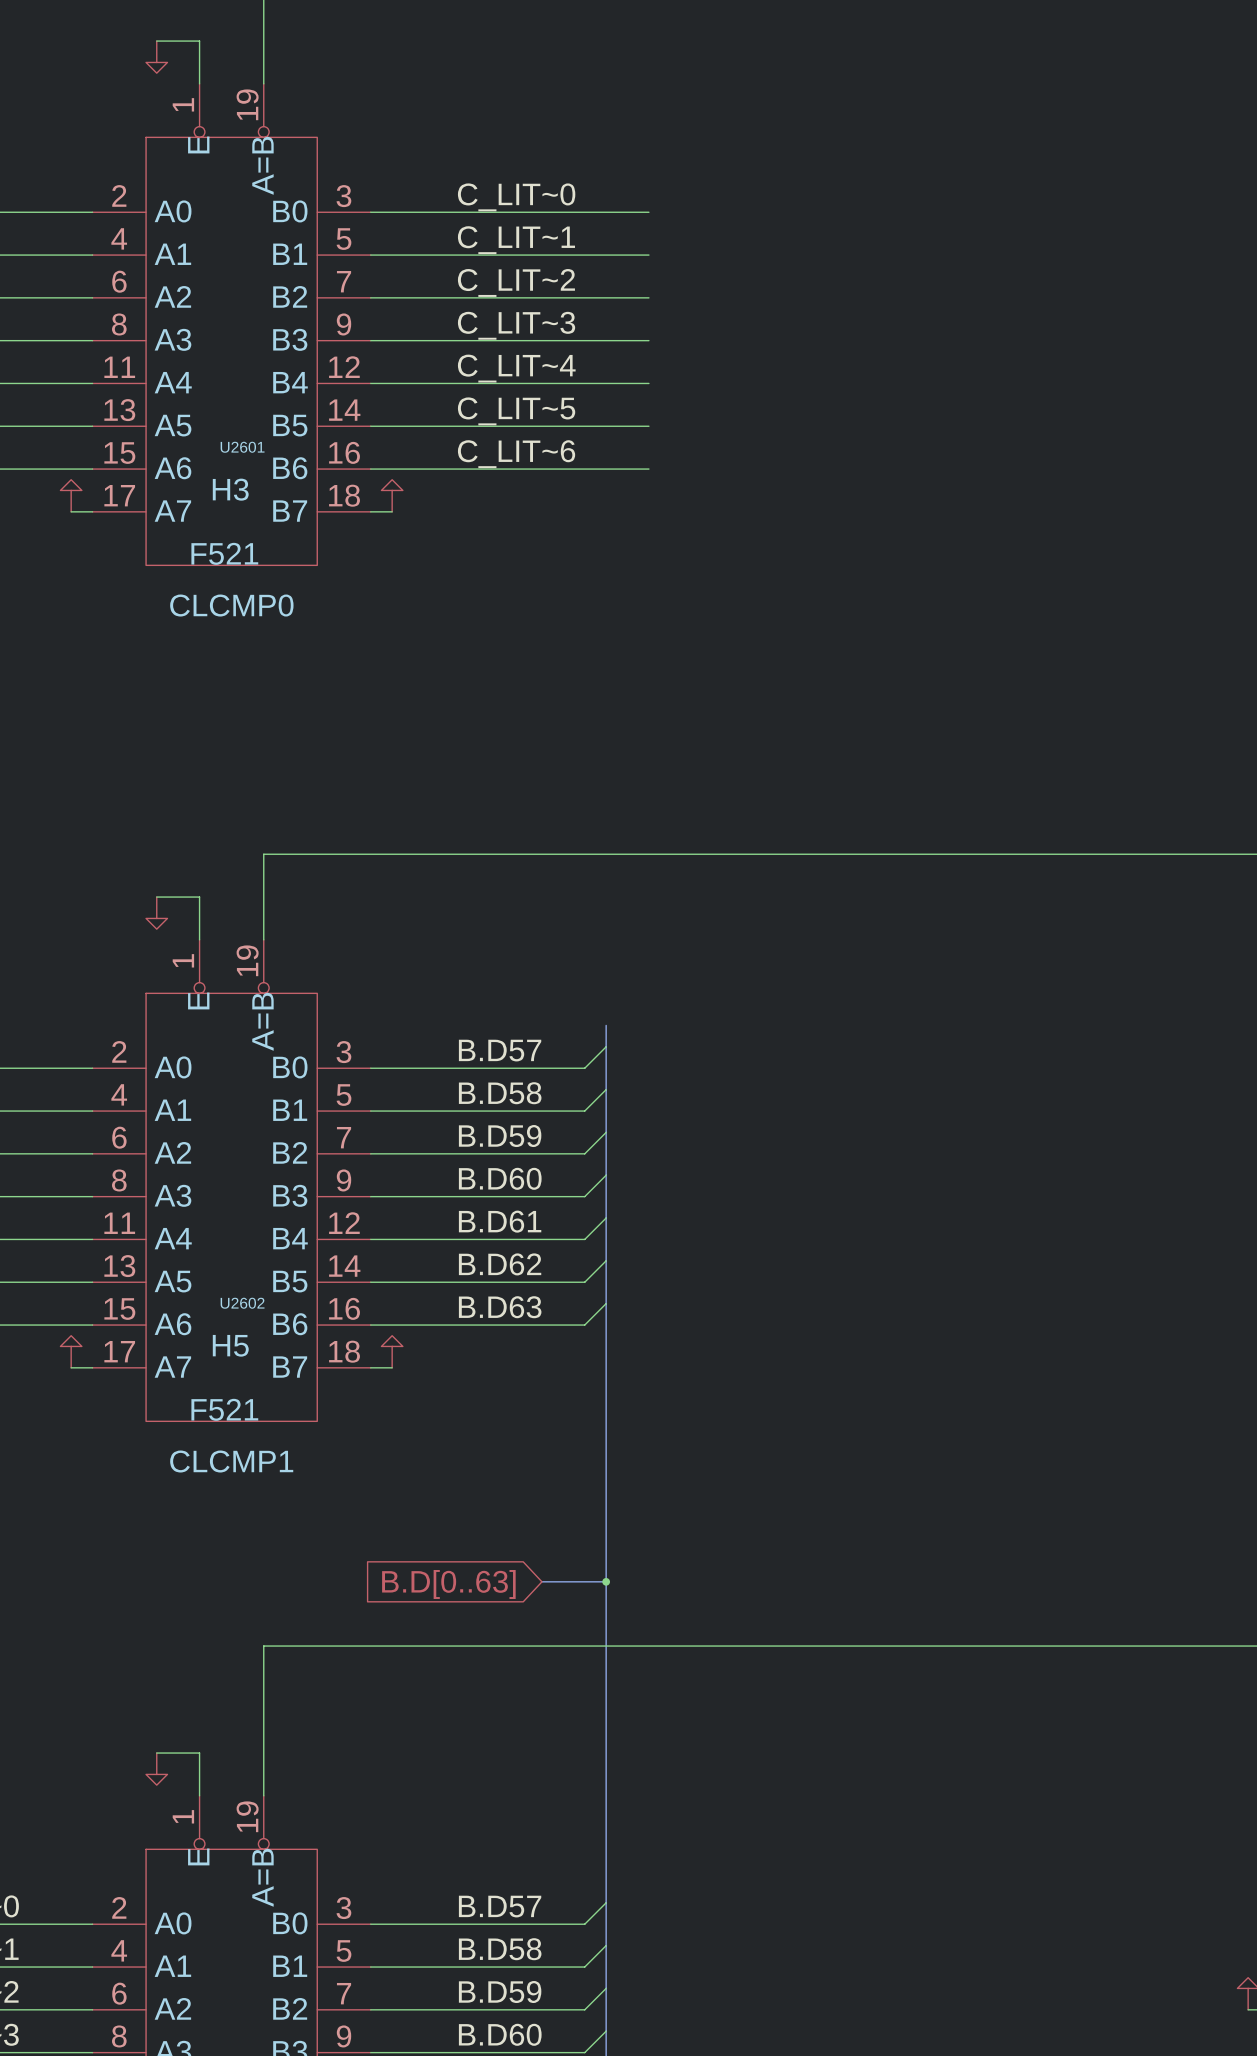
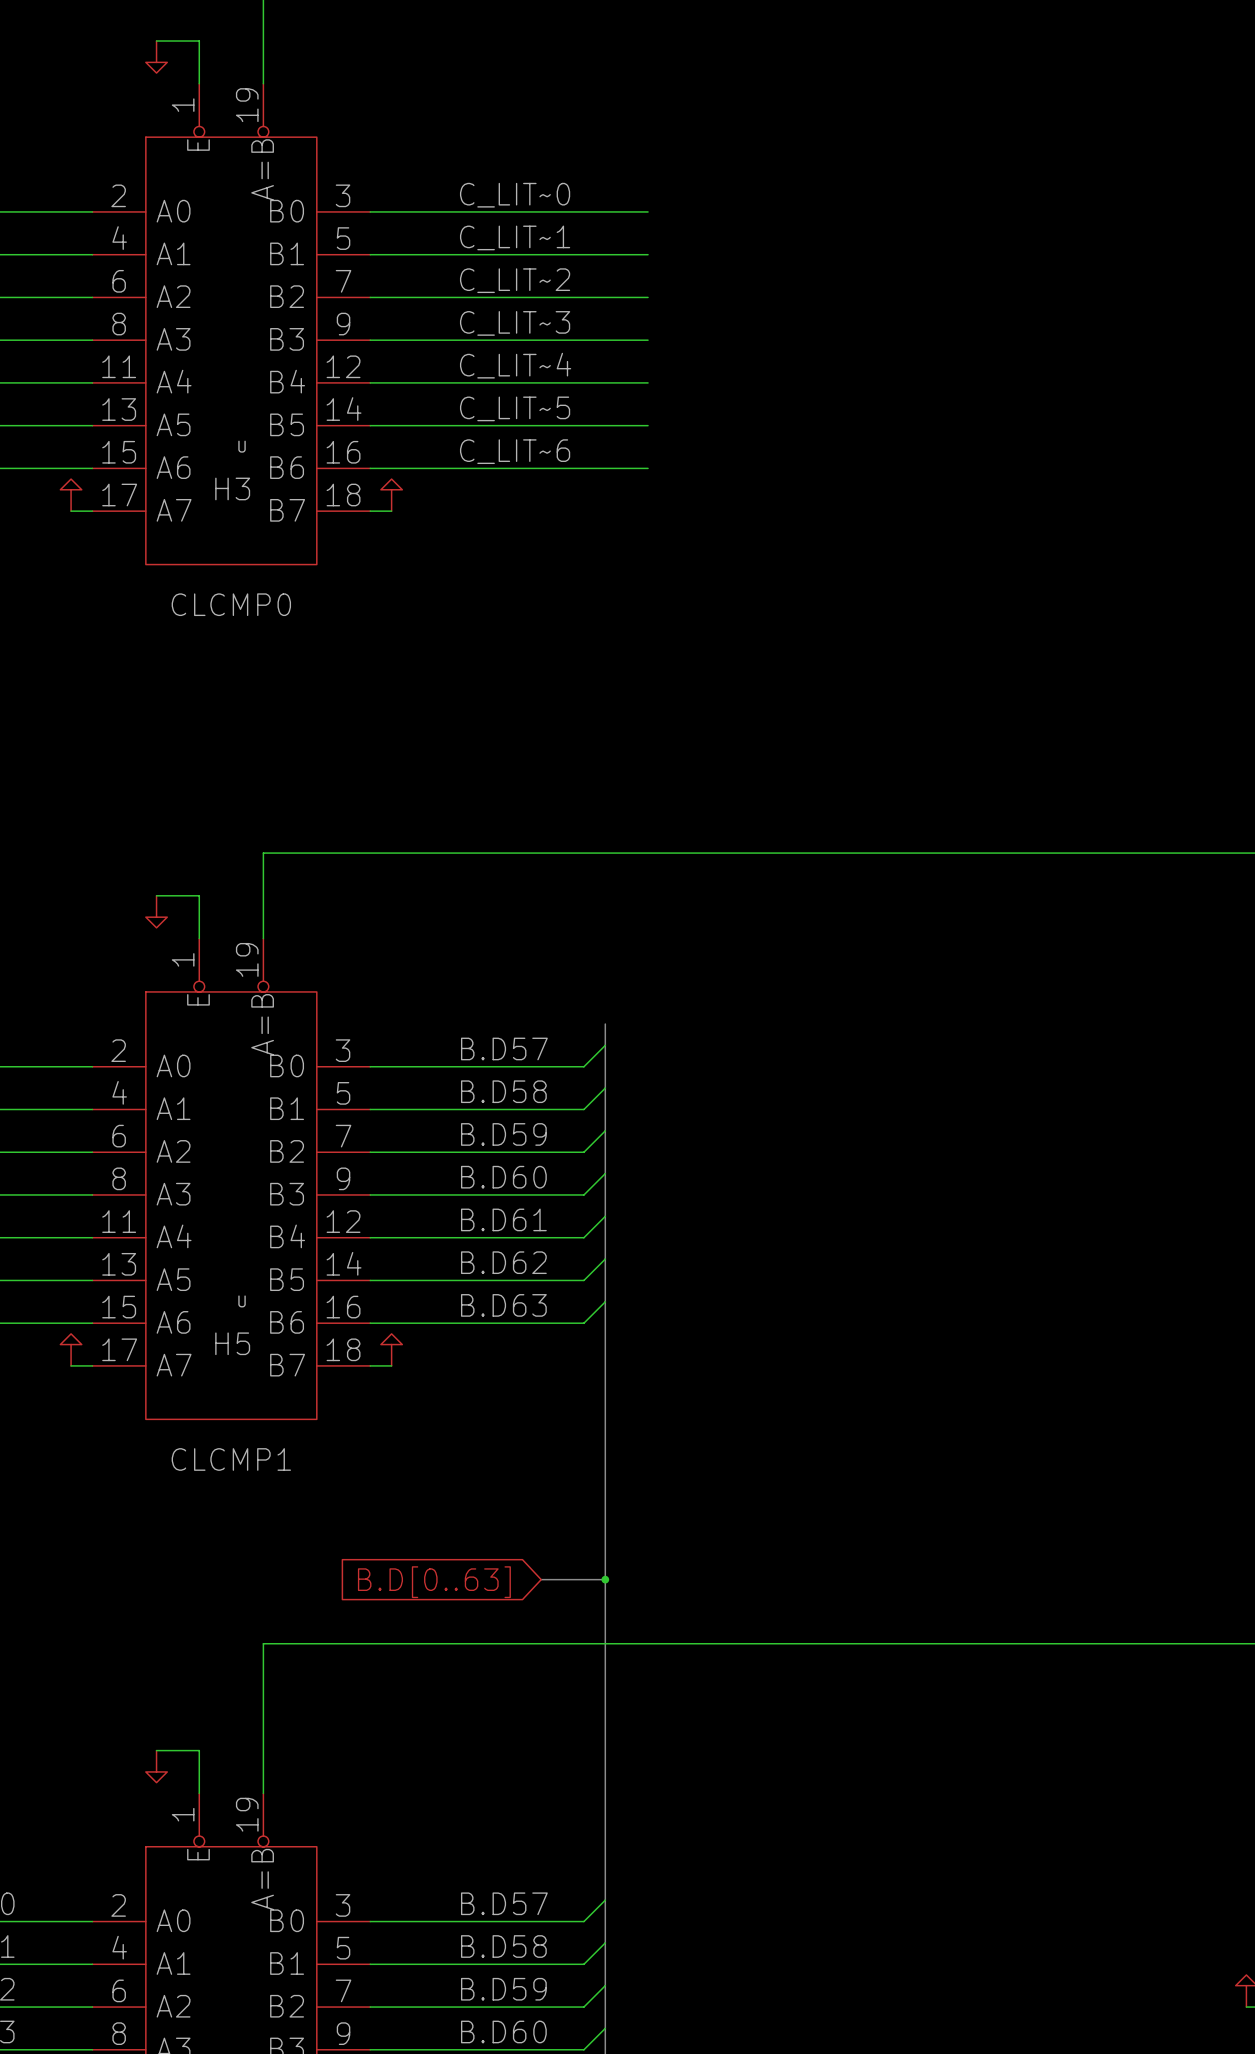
U2601 name: U2601 (242, 447) -> U (242, 446)
U2601 value: F521 (224, 553) -> none
U2602 name: U2602 (242, 1303) -> U (242, 1301)
U2602 value: F521 (224, 1409) -> none

